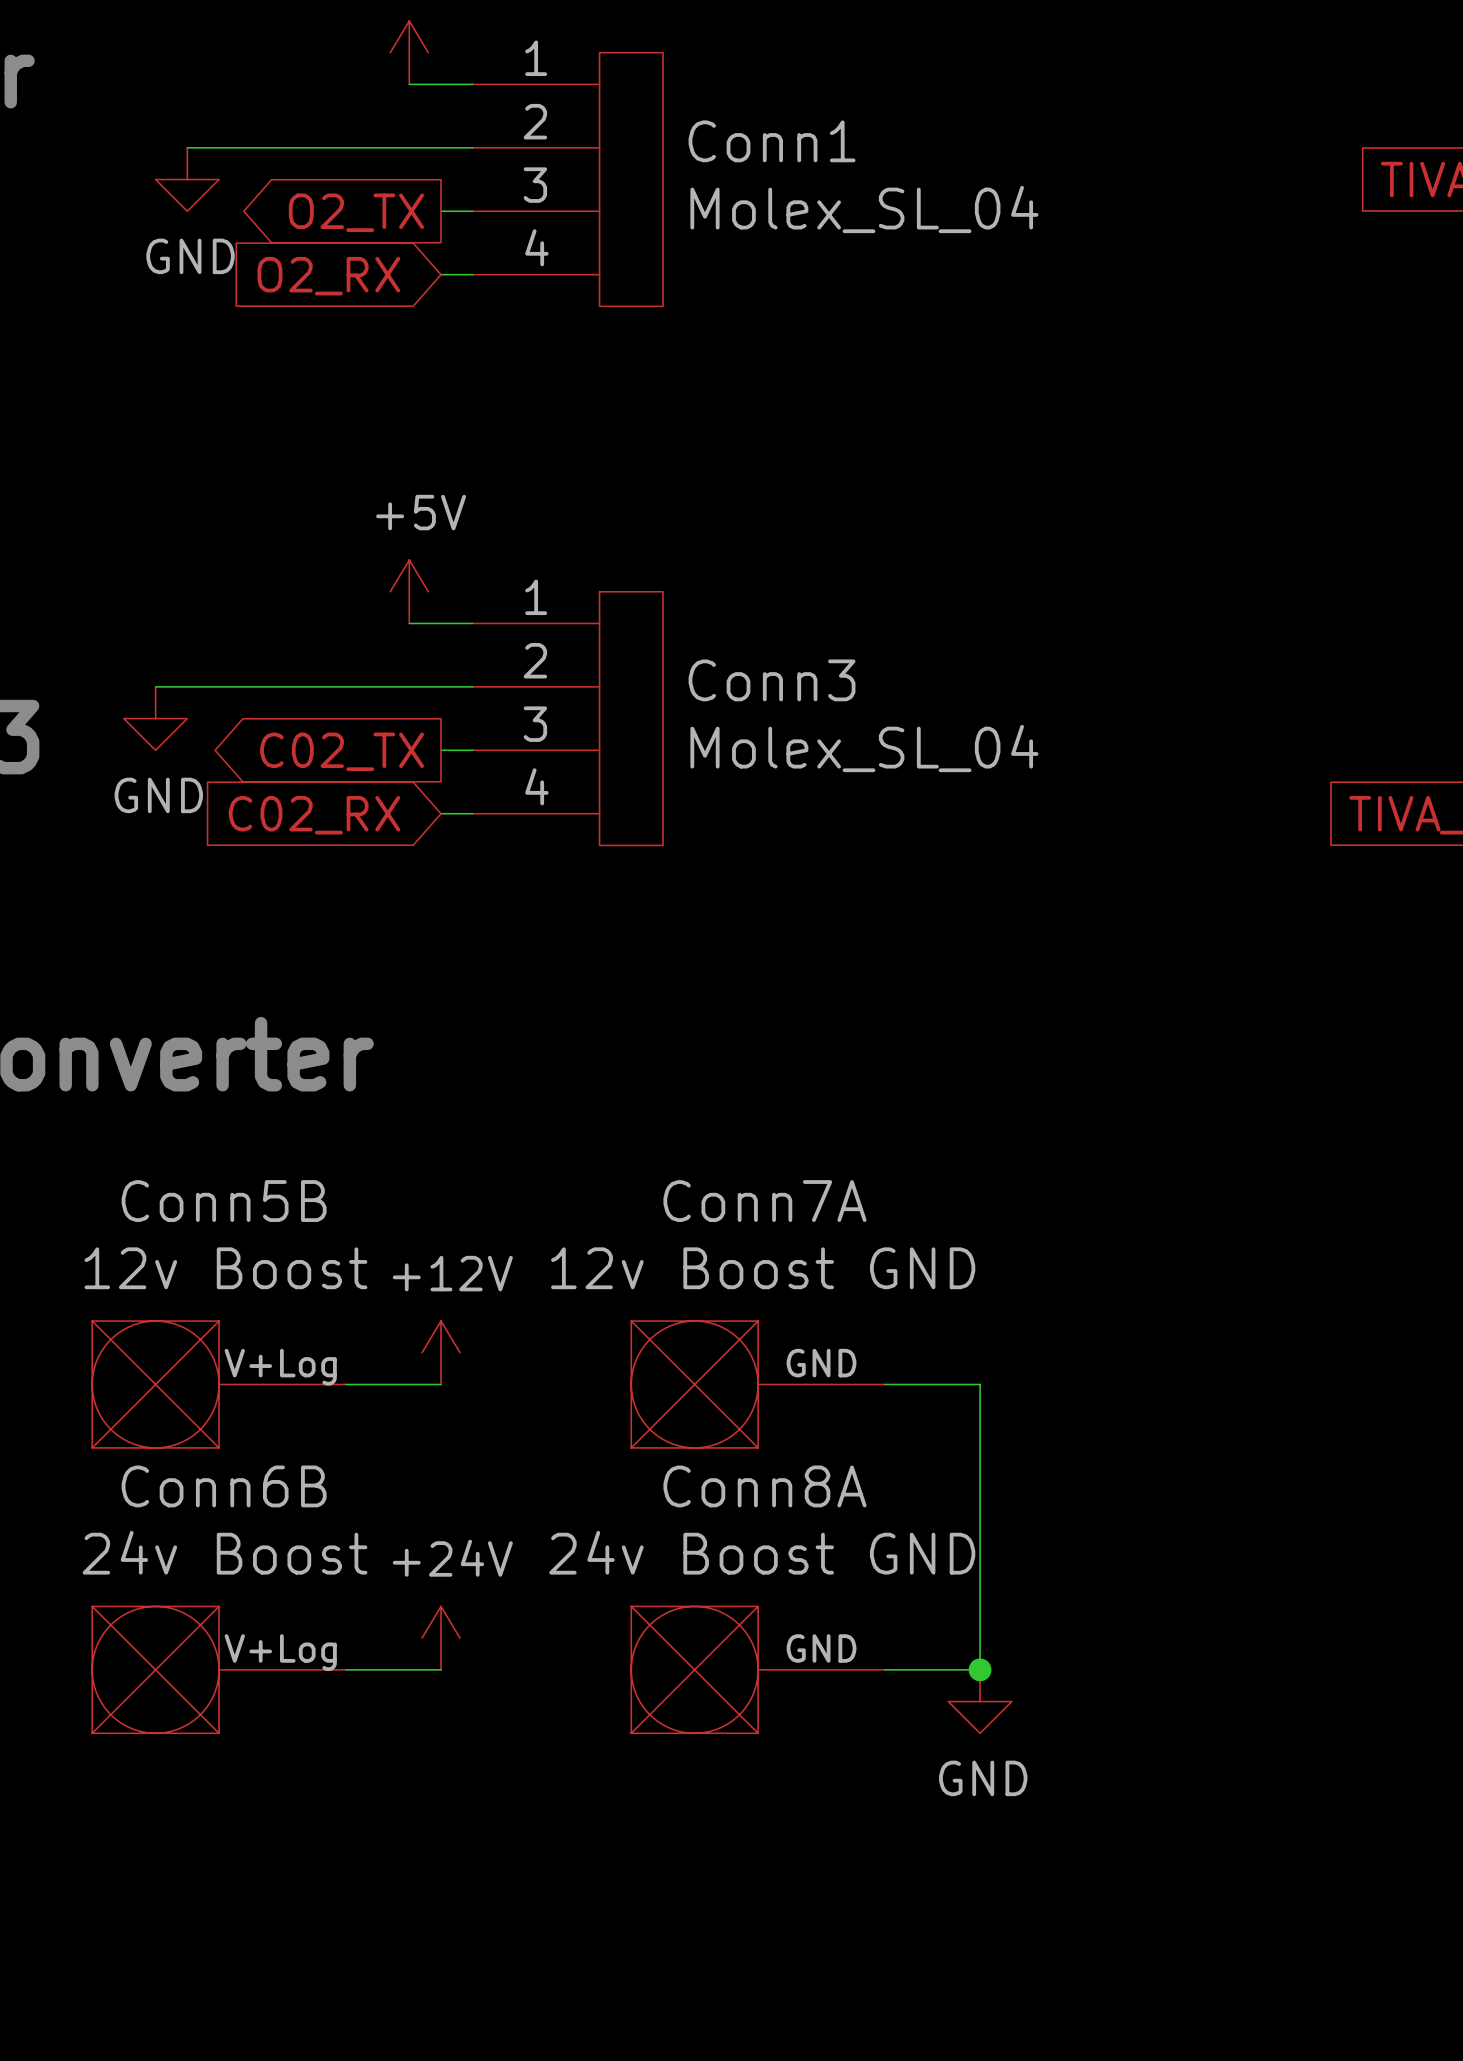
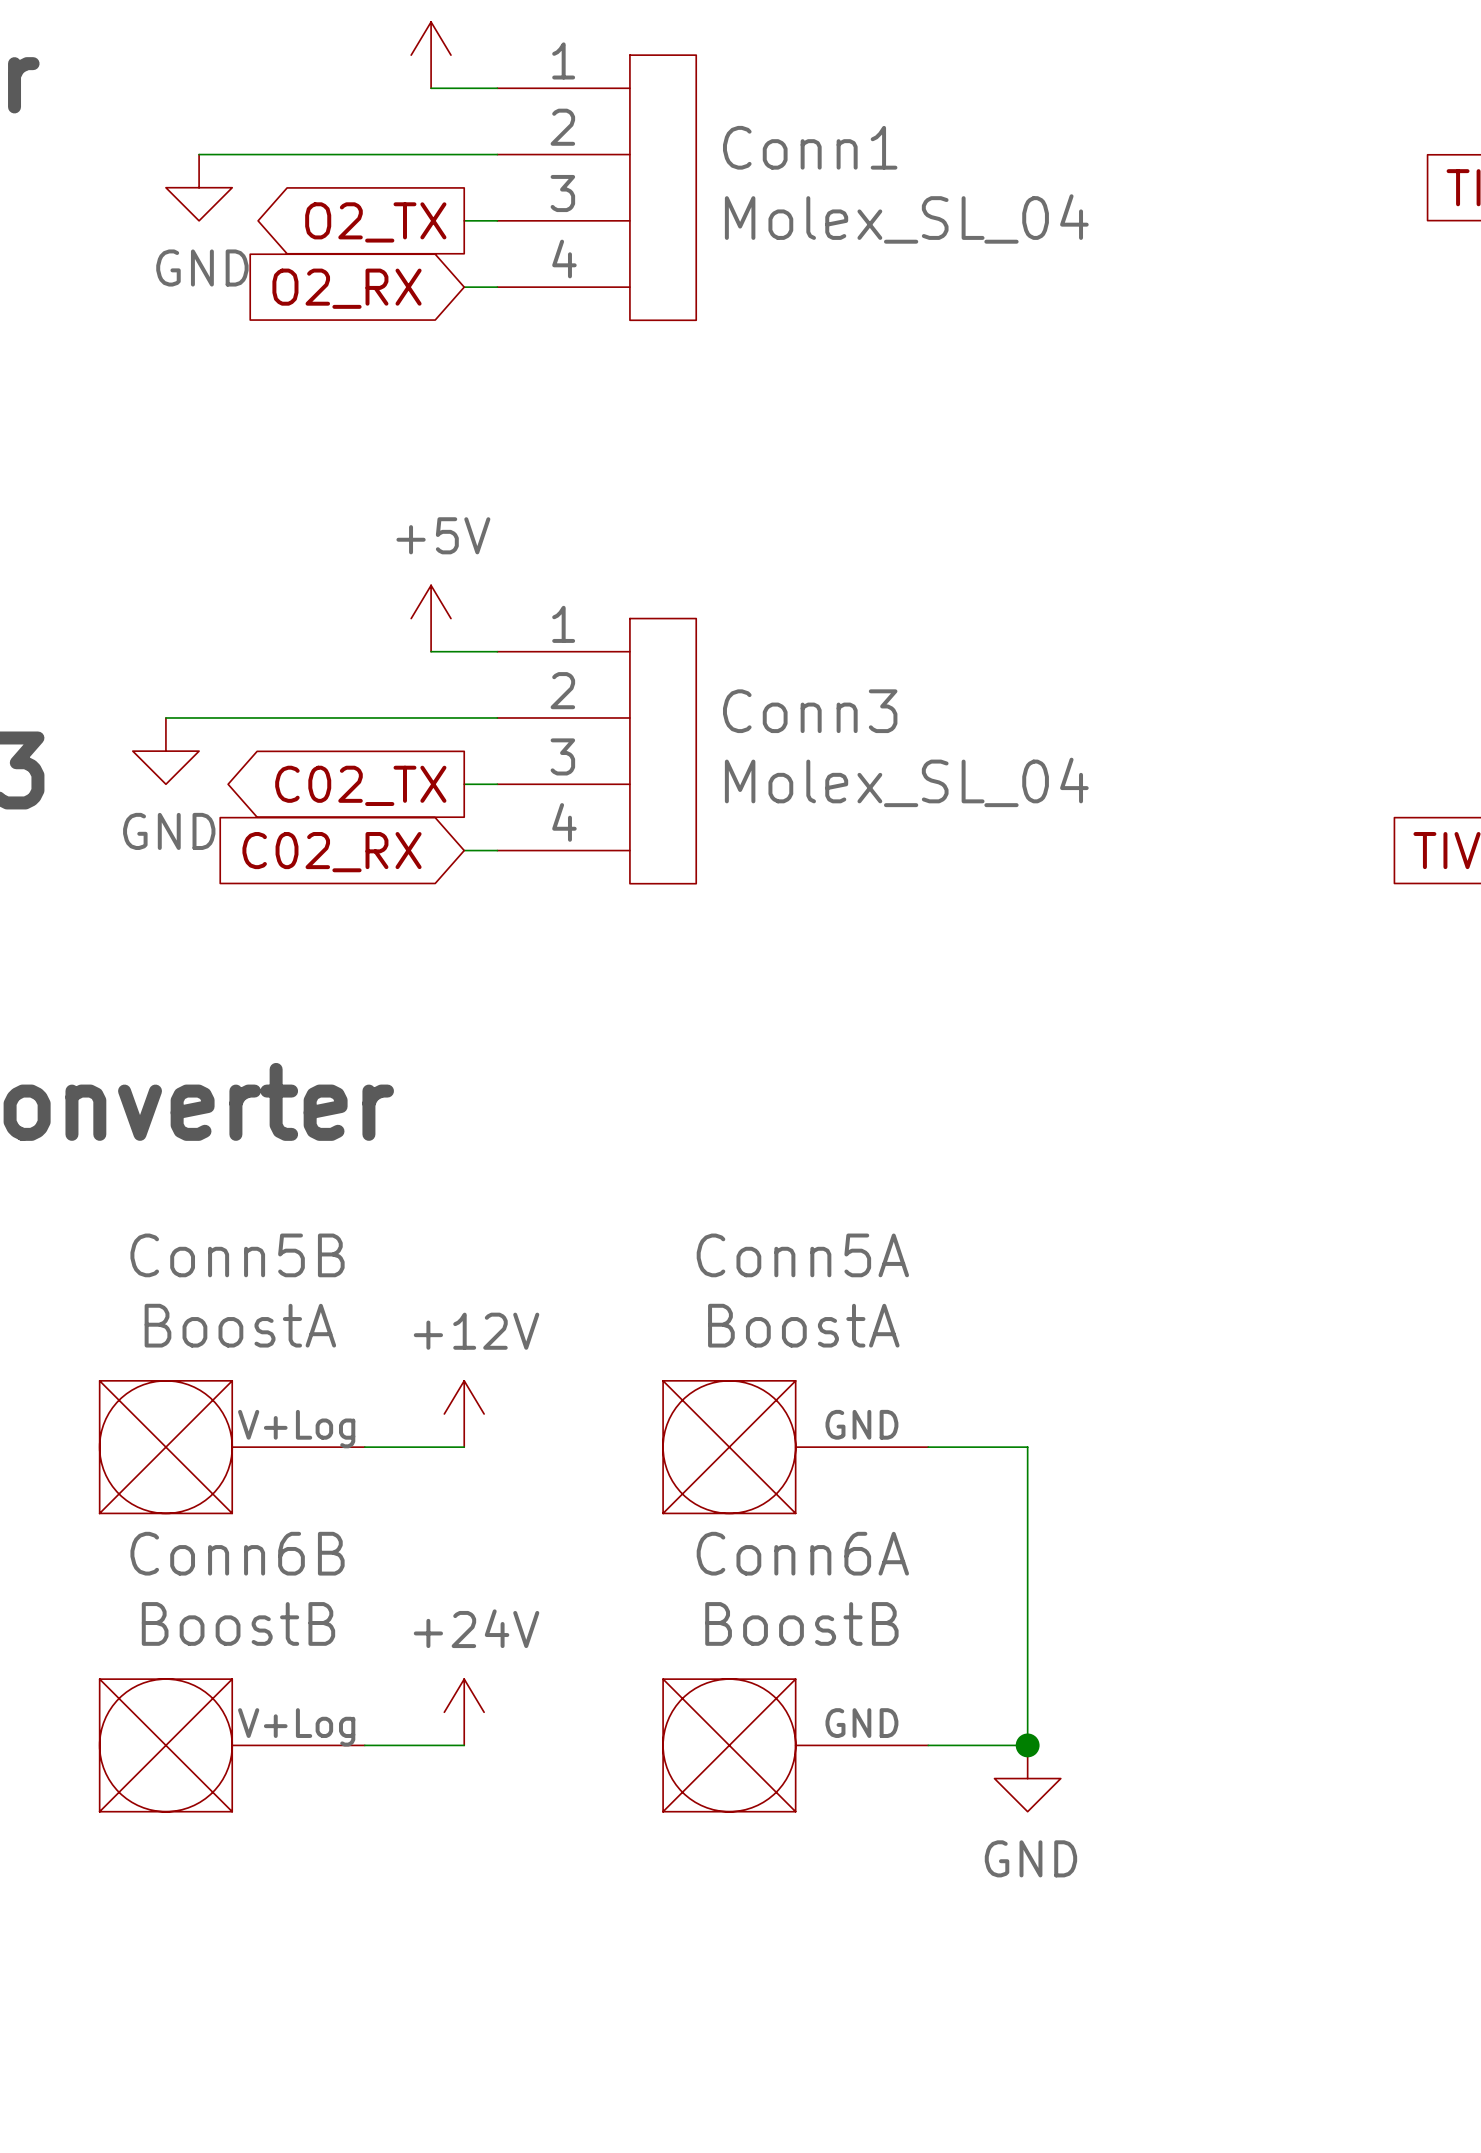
Conn7A name: Conn7A (764, 1201) -> Conn5A (802, 1255)
Conn5B value: 12v Boost (225, 1268) -> BoostA (240, 1325)
Conn7A value: 12v Boost GND (763, 1268) -> BoostA (803, 1325)
Conn8A name: Conn8A (764, 1486) -> Conn6A (802, 1553)
Conn6B value: 24v Boost (225, 1552) -> BoostB (238, 1623)
Conn8A value: 24v Boost GND (762, 1552) -> BoostB (801, 1623)

